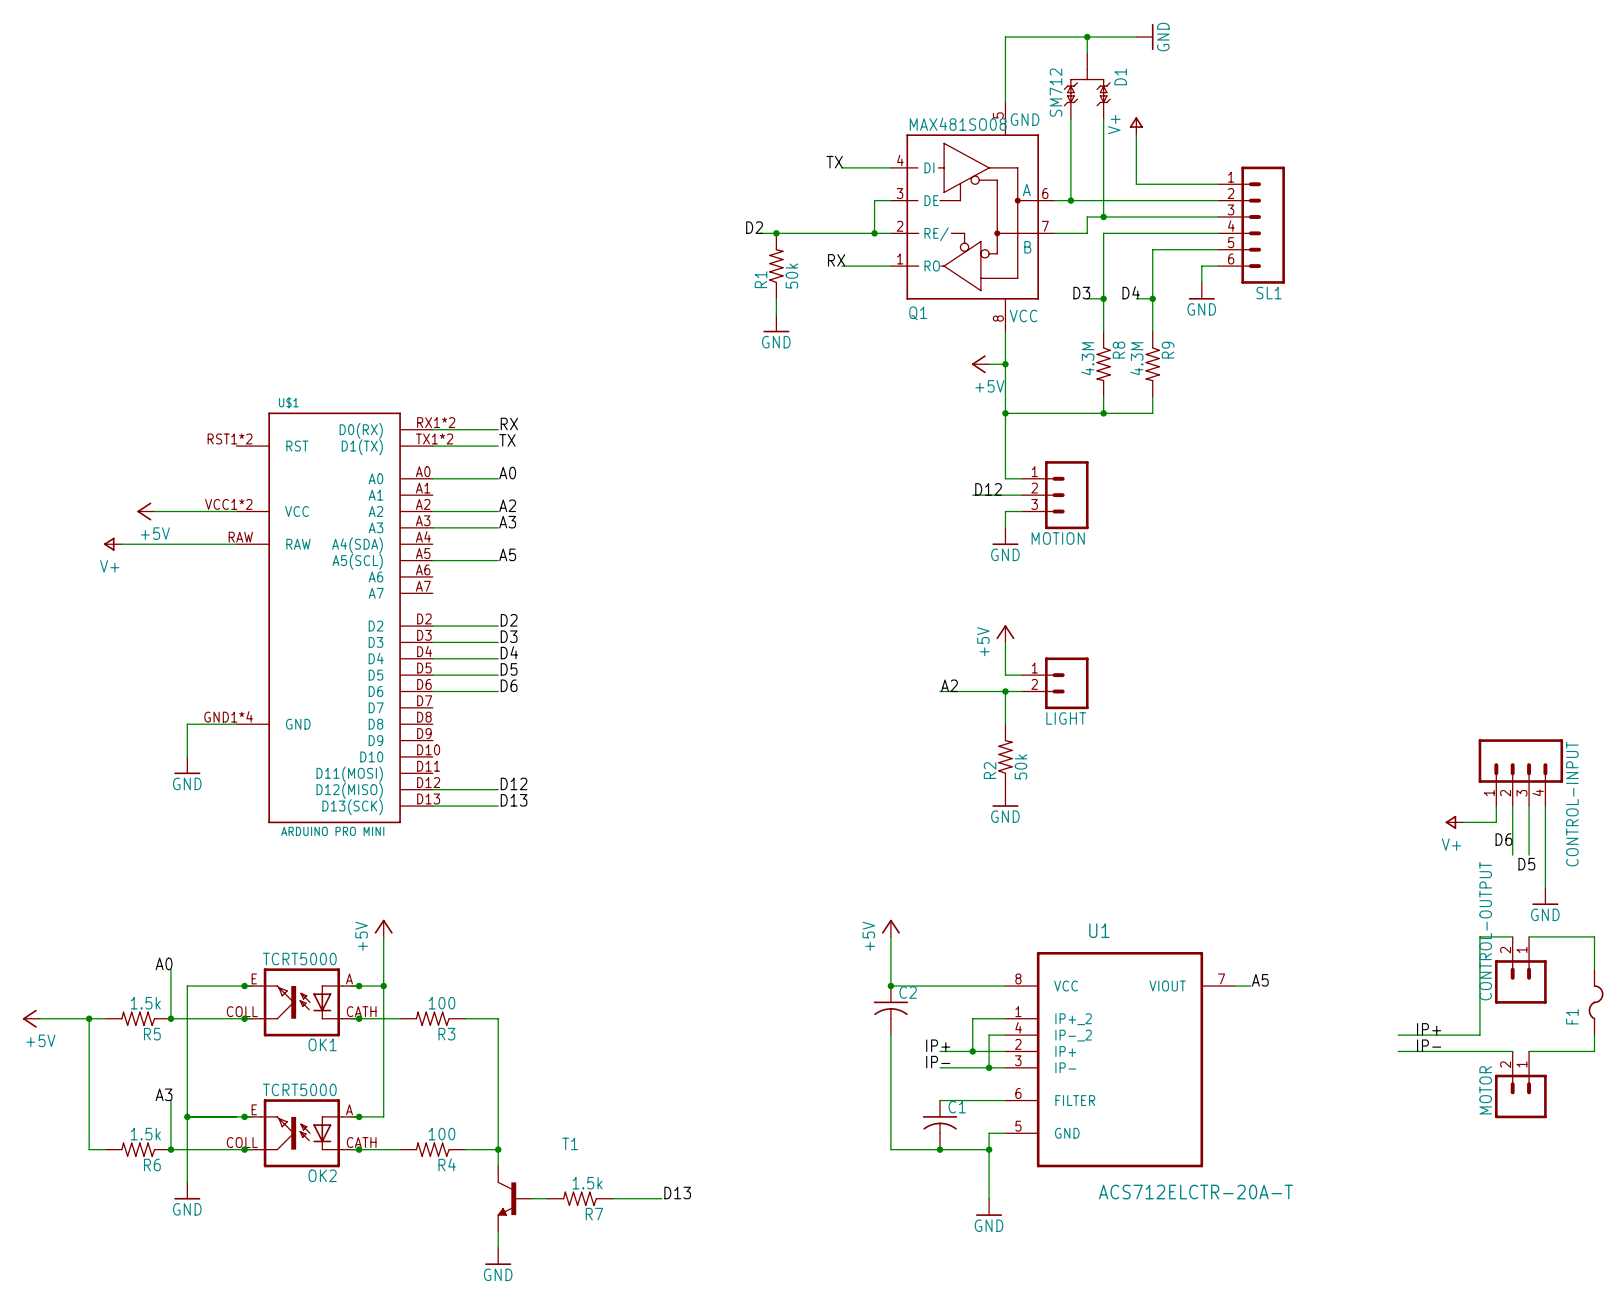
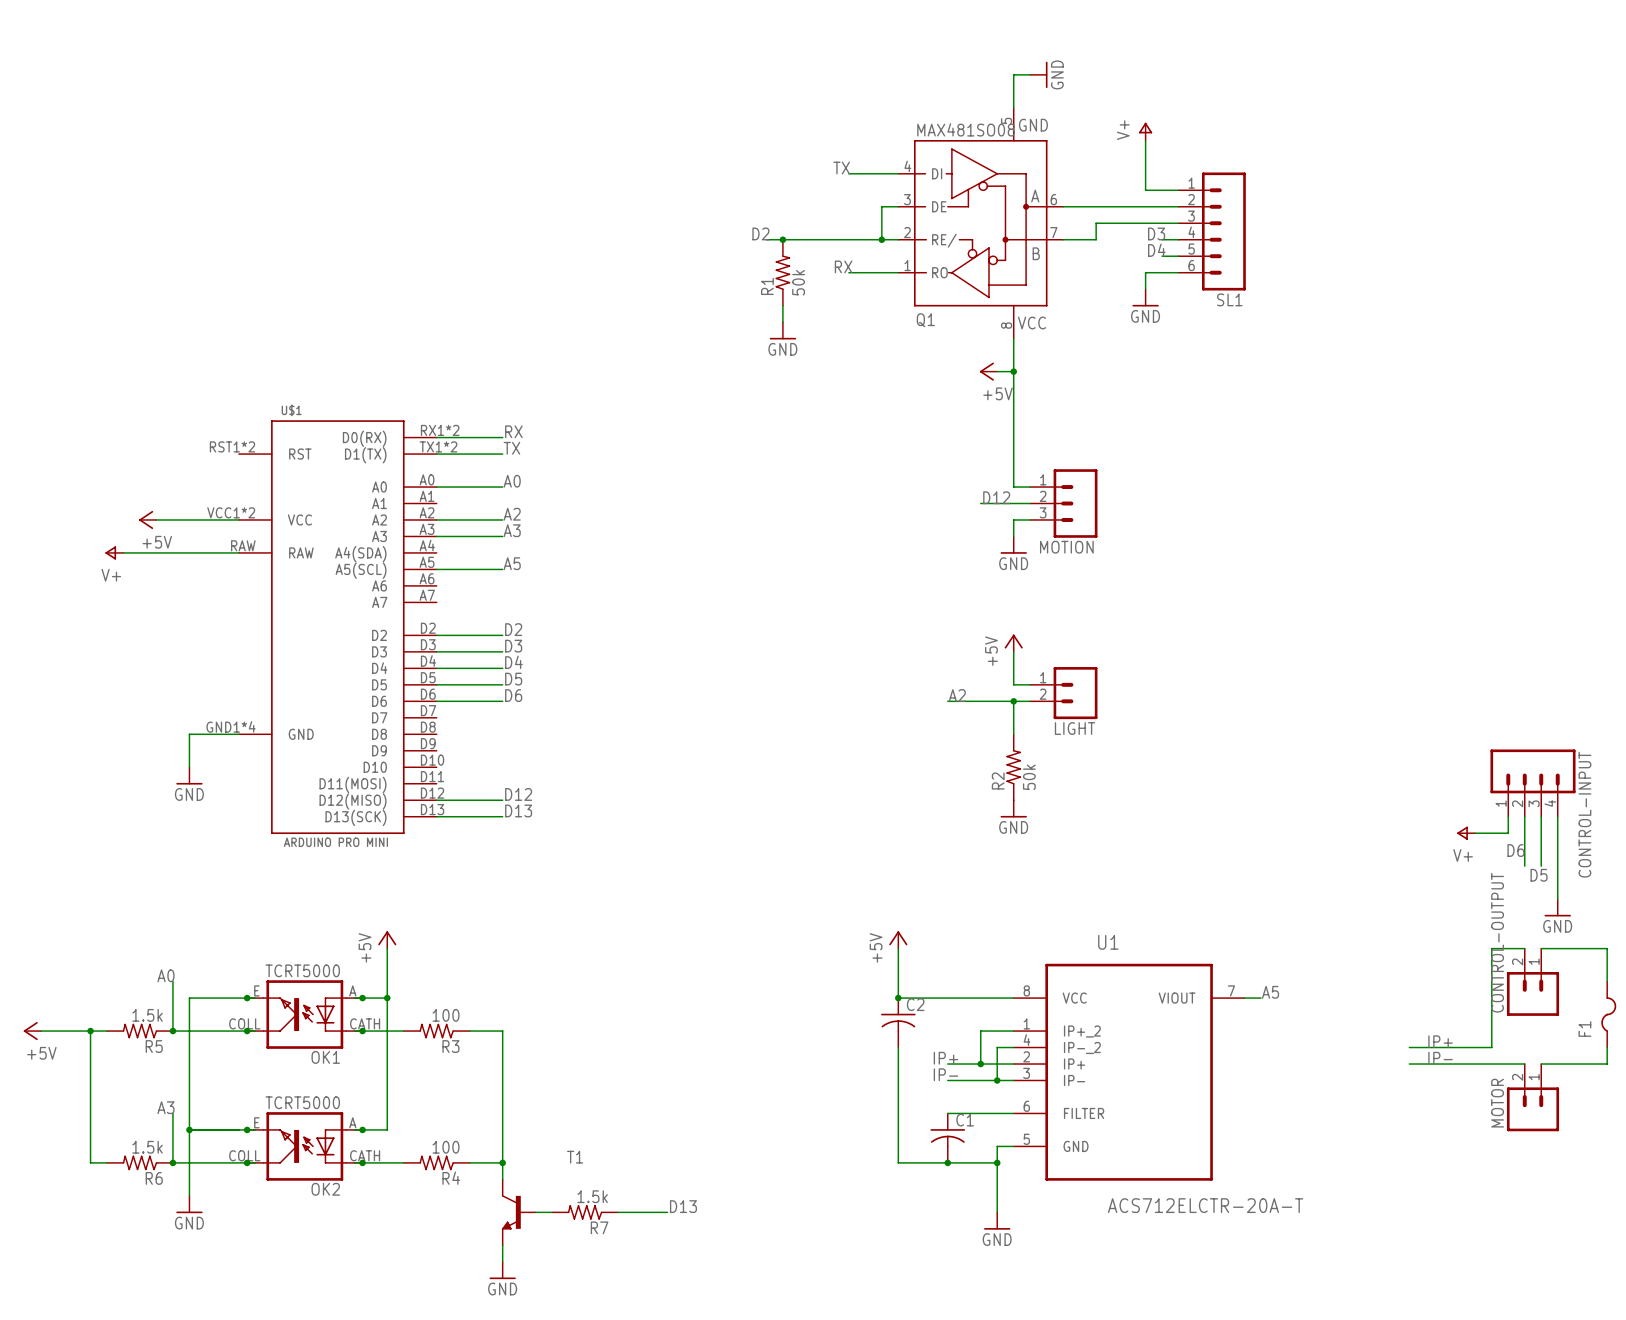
wire: (1087, 37) (1087, 53) -> none
junction: (1087, 37) -> none
wire: (1136, 37) (1005, 37) (1005, 69) -> (1030, 74) (1013, 74)
power symbol position: GND (1144, 37) -> GND (1038, 74)
D1: SM712 (1087, 86) -> none
wire: (1070, 118) (1070, 200) -> none
wire: (1103, 118) (1103, 216) -> none
junction: (1070, 200) -> none
junction: (1103, 216) -> none
SL1 position: (1251, 225) -> (1212, 231)
wire: (1152, 233) (1103, 233) (1103, 331) -> none
wire: (1152, 249) (1152, 331) -> none
wire: none -> (1178, 272) (1145, 272) (1145, 289)
wire: (1218, 266) (1201, 266) (1201, 282) -> none
power symbol position: GND (1201, 291) -> GND (1145, 297)
label position: D4 (1131, 292) -> D4 (1156, 250)
label position: D3 (1081, 293) -> D3 (1156, 233)
wire: (1087, 298) (1103, 298) -> none
junction: (1103, 298) -> none
junction: (1152, 298) -> none
R8: 4.3M (1103, 364) -> none
R9: 4.3M (1152, 364) -> none
wire: (1103, 396) (1103, 413) -> none
wire: (1152, 396) (1152, 413) (1005, 413) -> none
junction: (1005, 413) -> none
junction: (1103, 413) -> none

